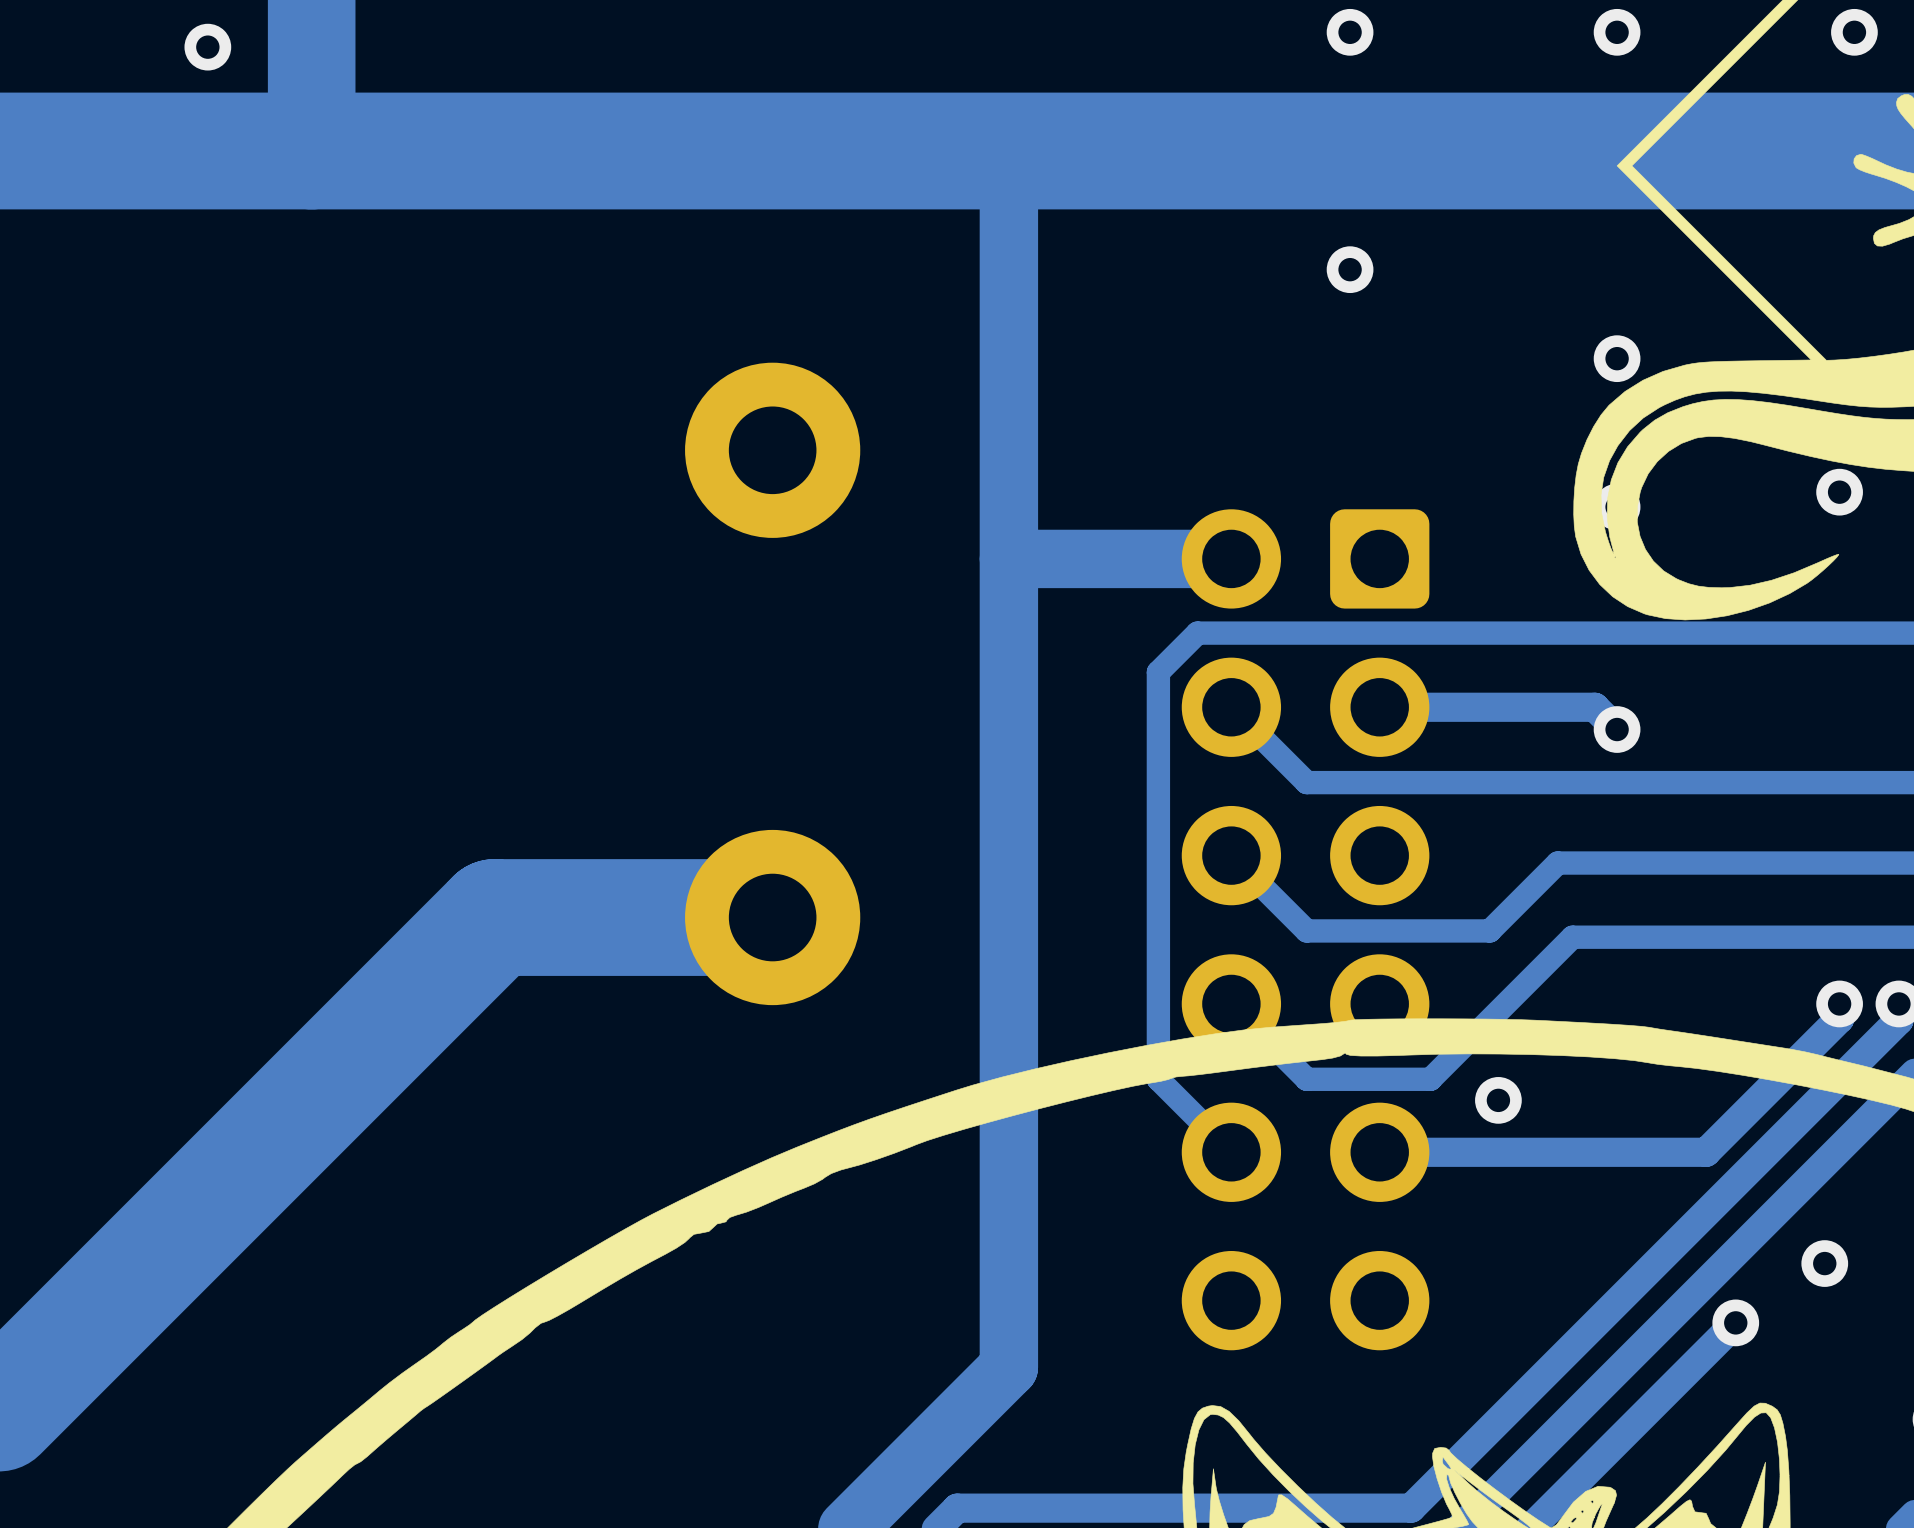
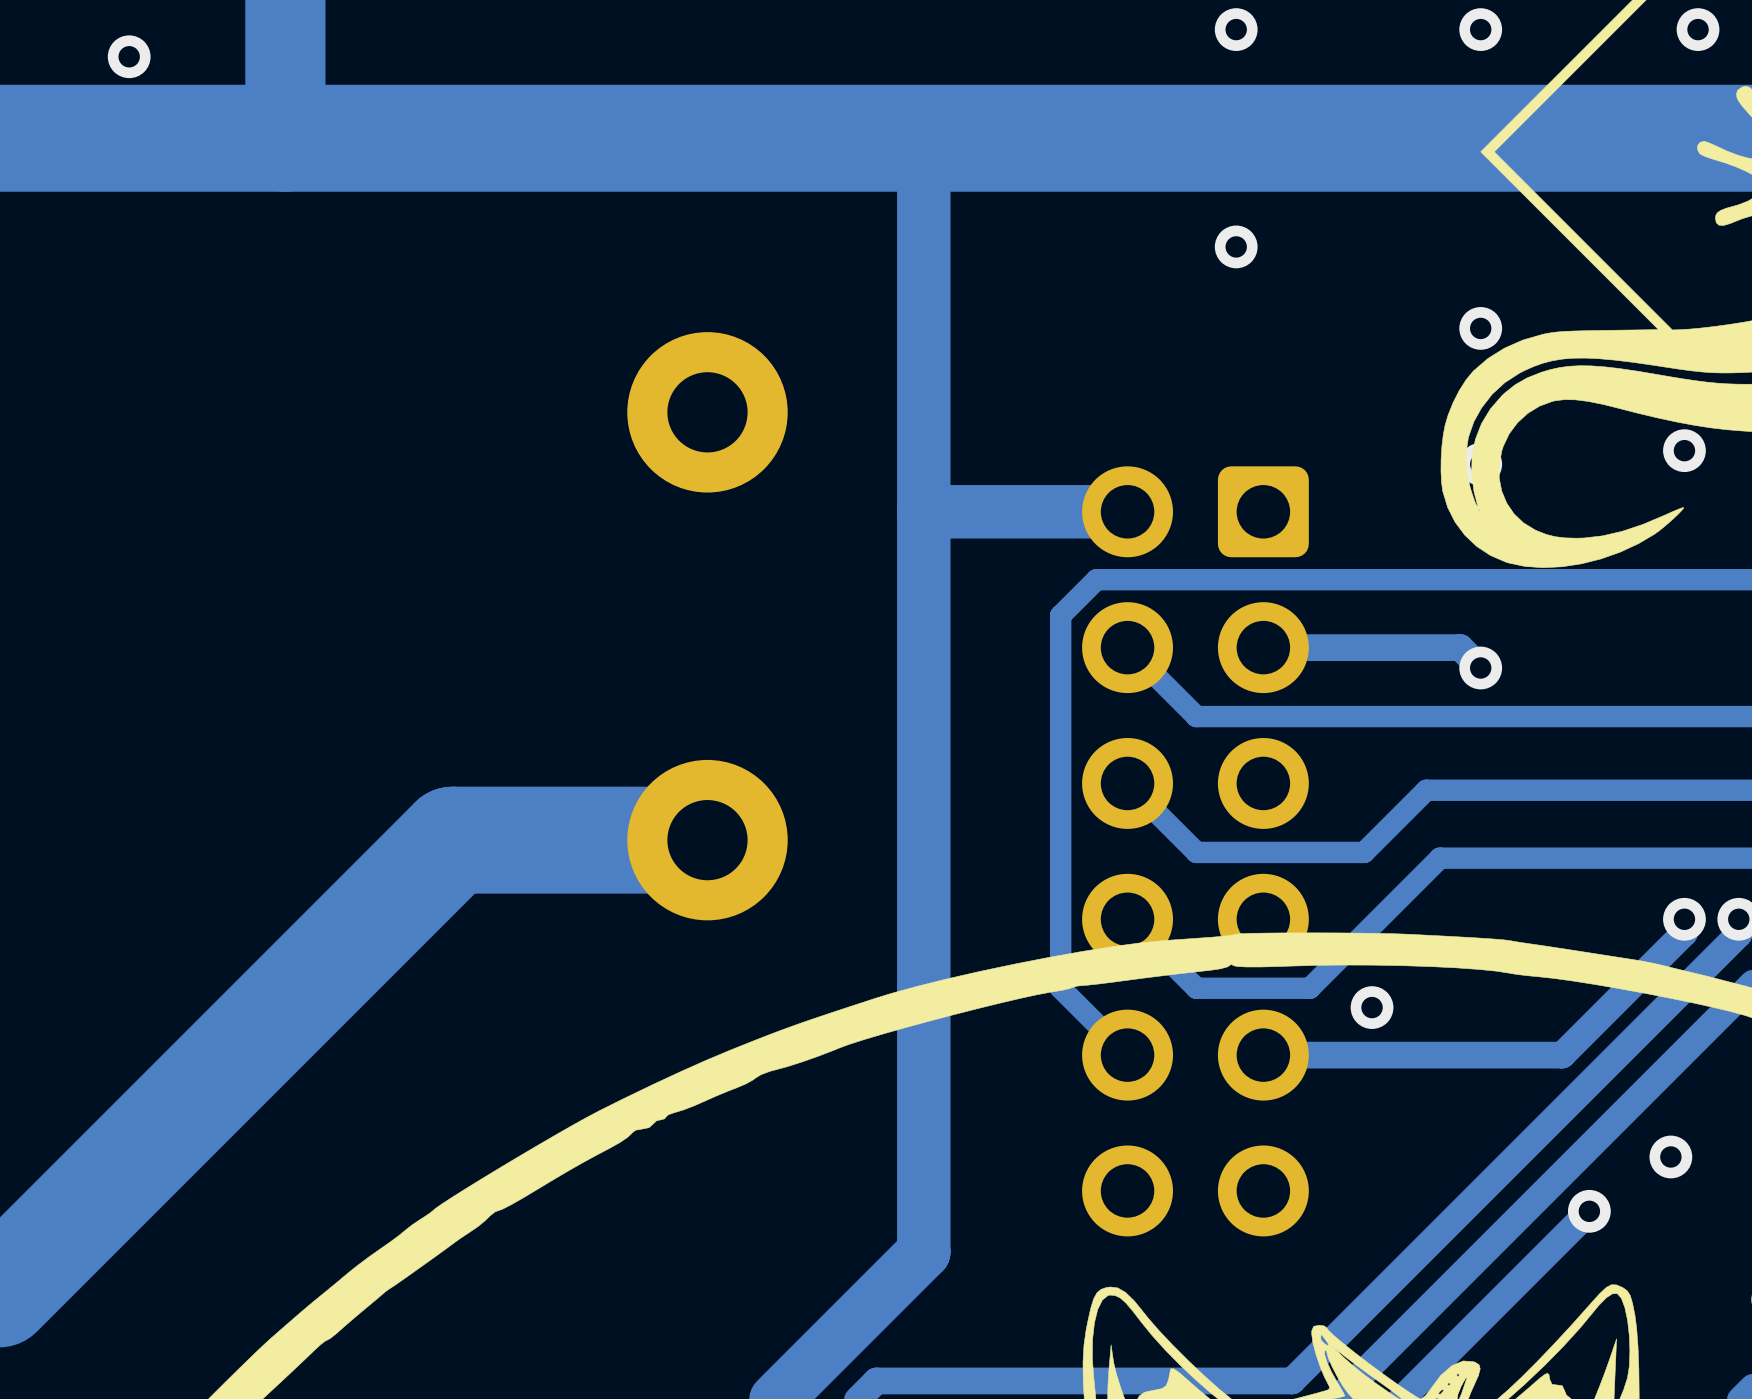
via position: (207, 47) -> (129, 56)

